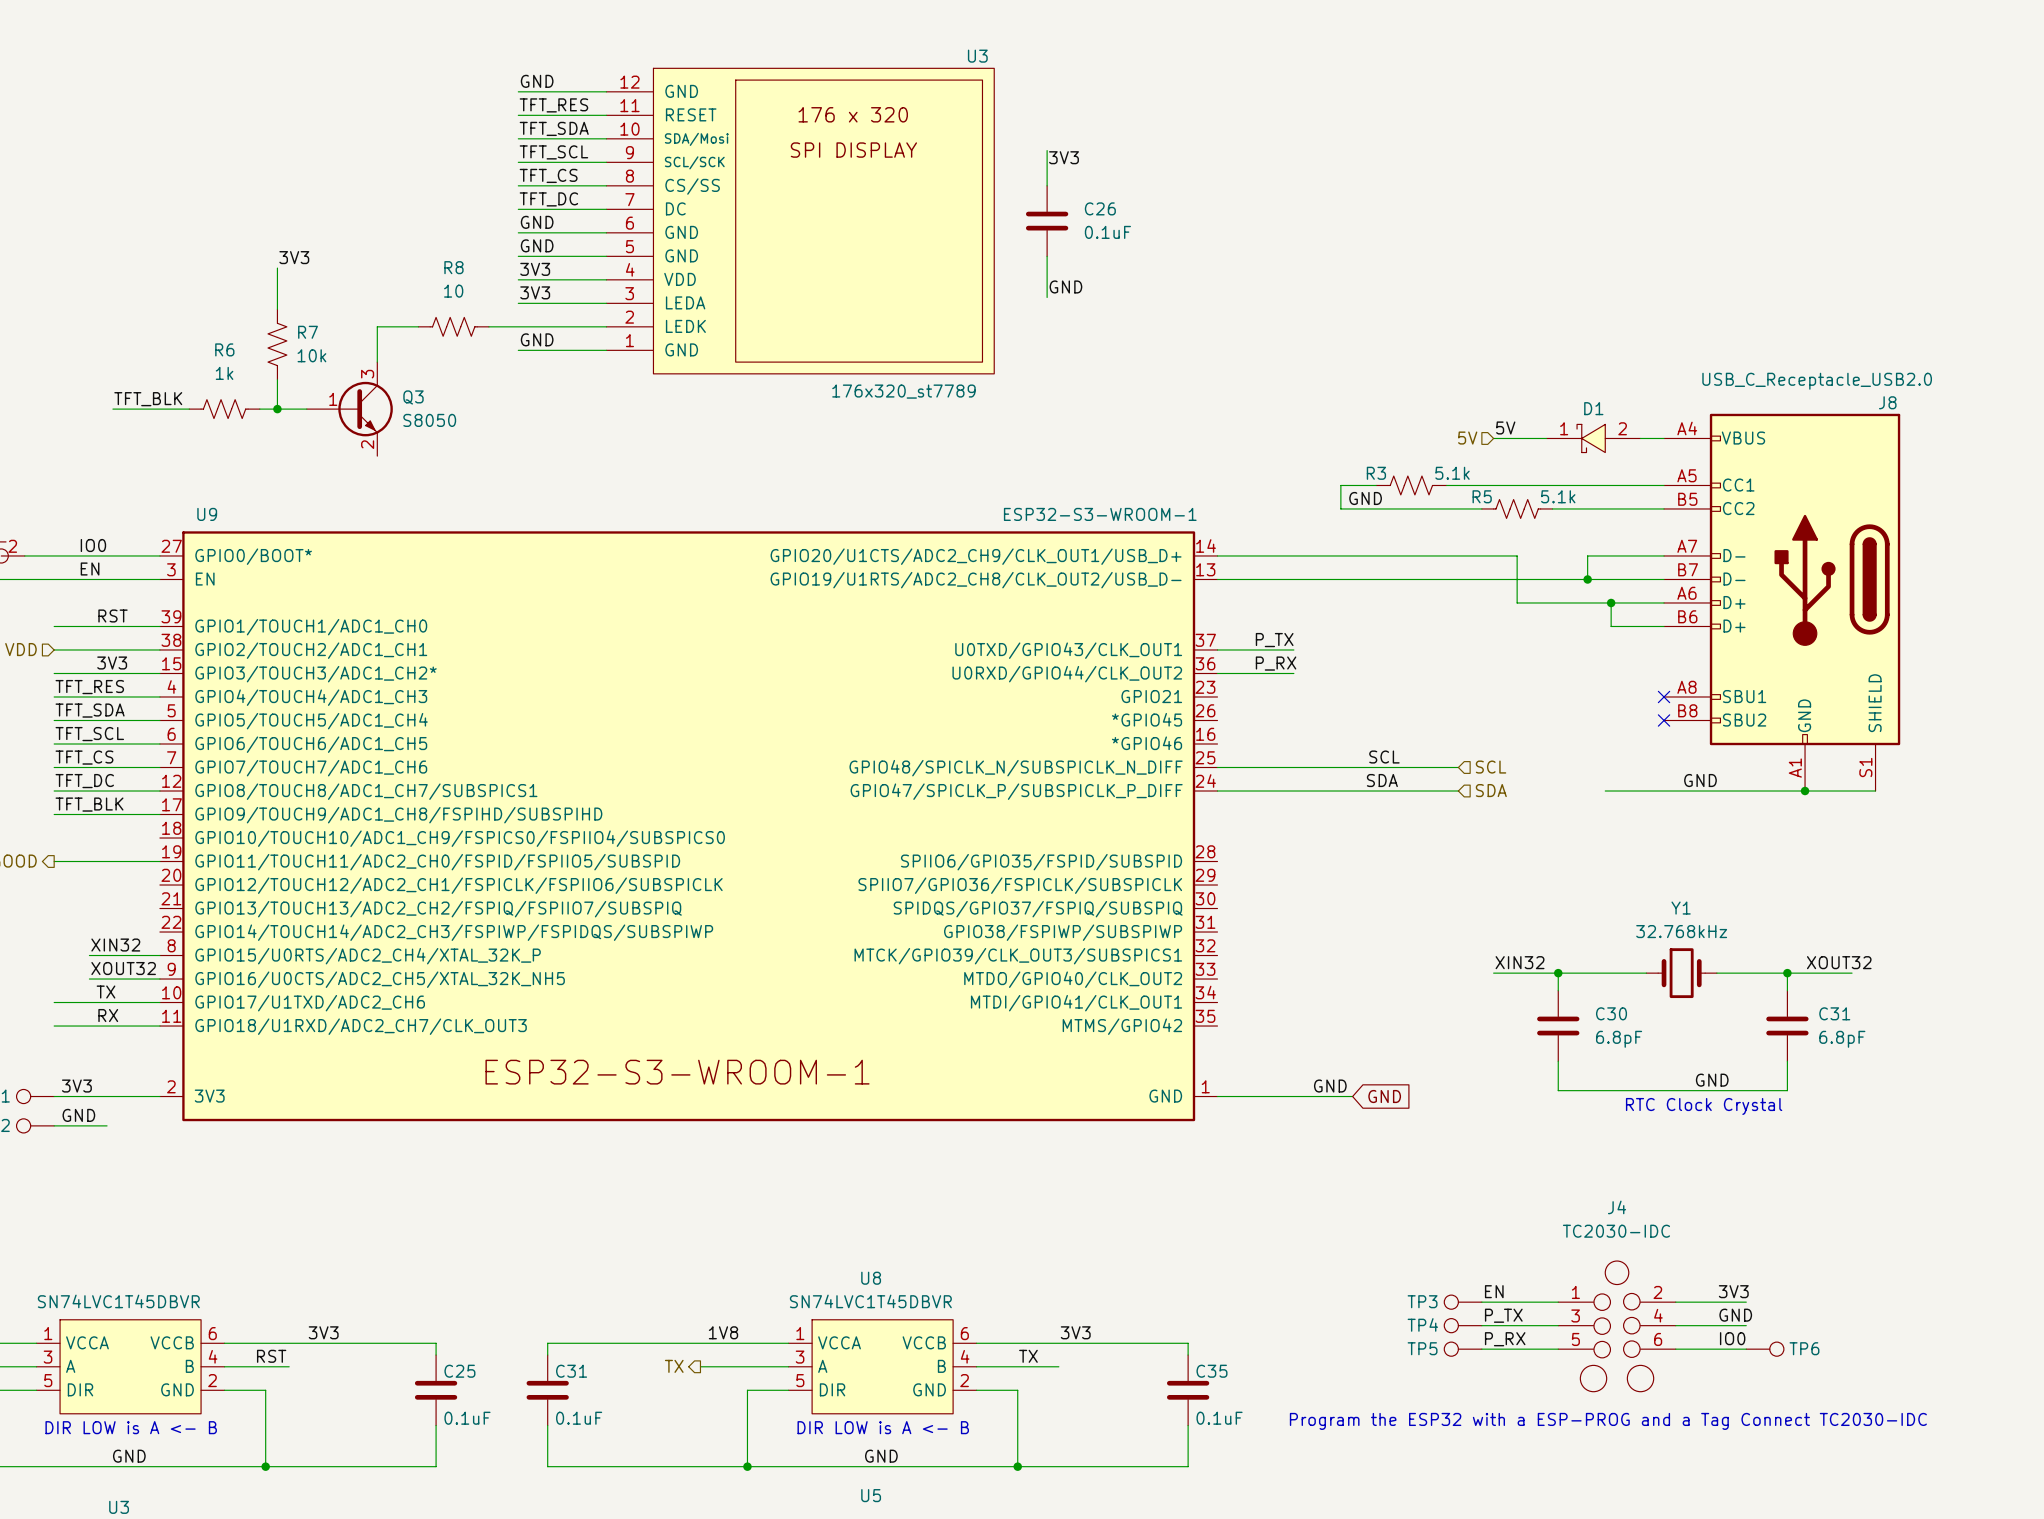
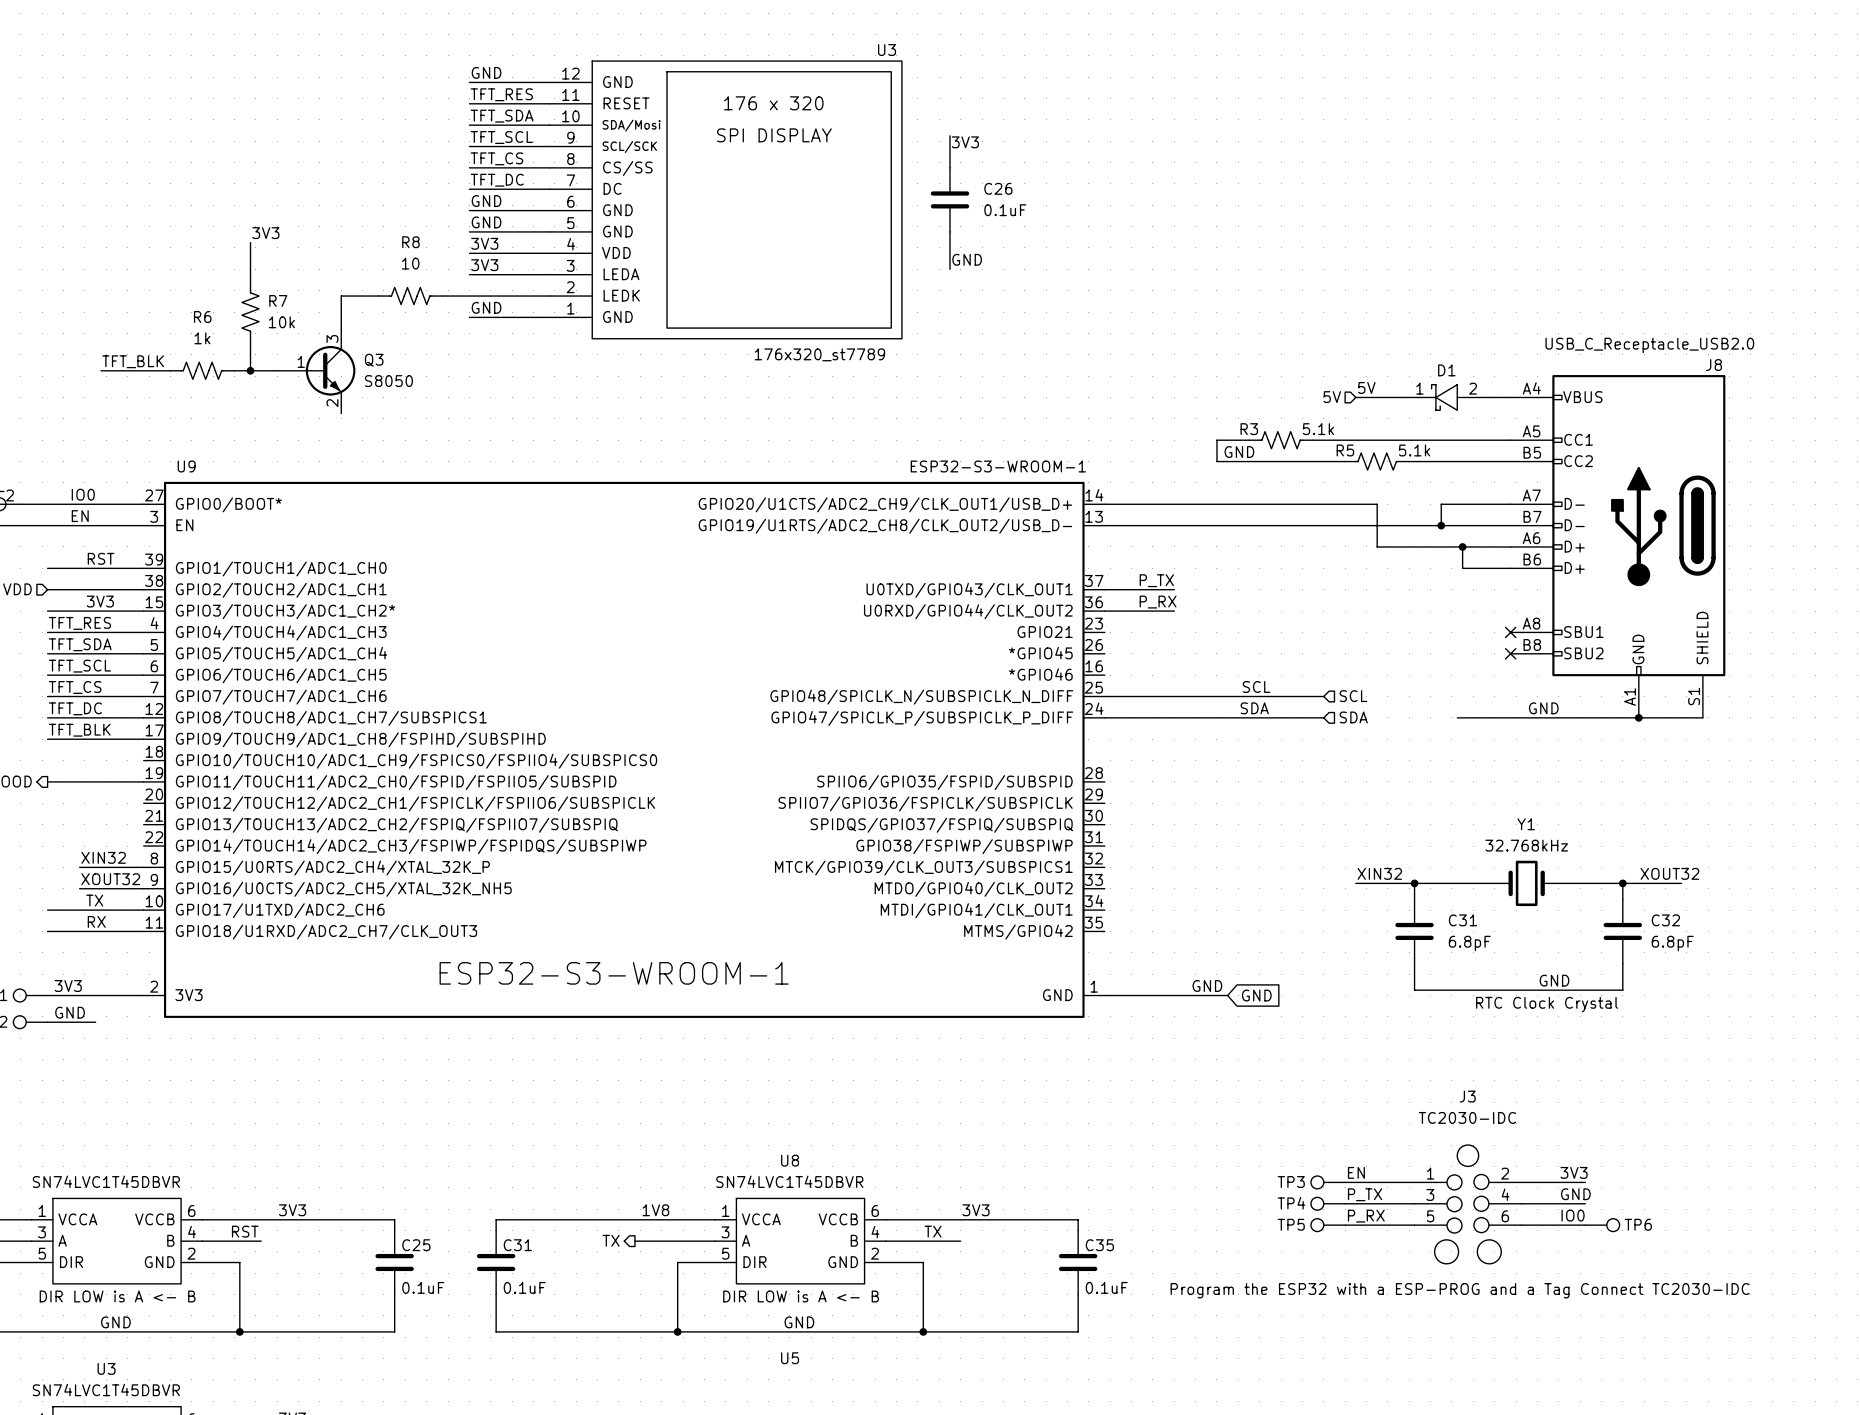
C30 name: C30 (1611, 1013) -> C31 (1462, 920)
C31 name: C31 (1834, 1013) -> C32 (1665, 920)
J4 name: J4 (1617, 1207) -> J3 (1467, 1096)

